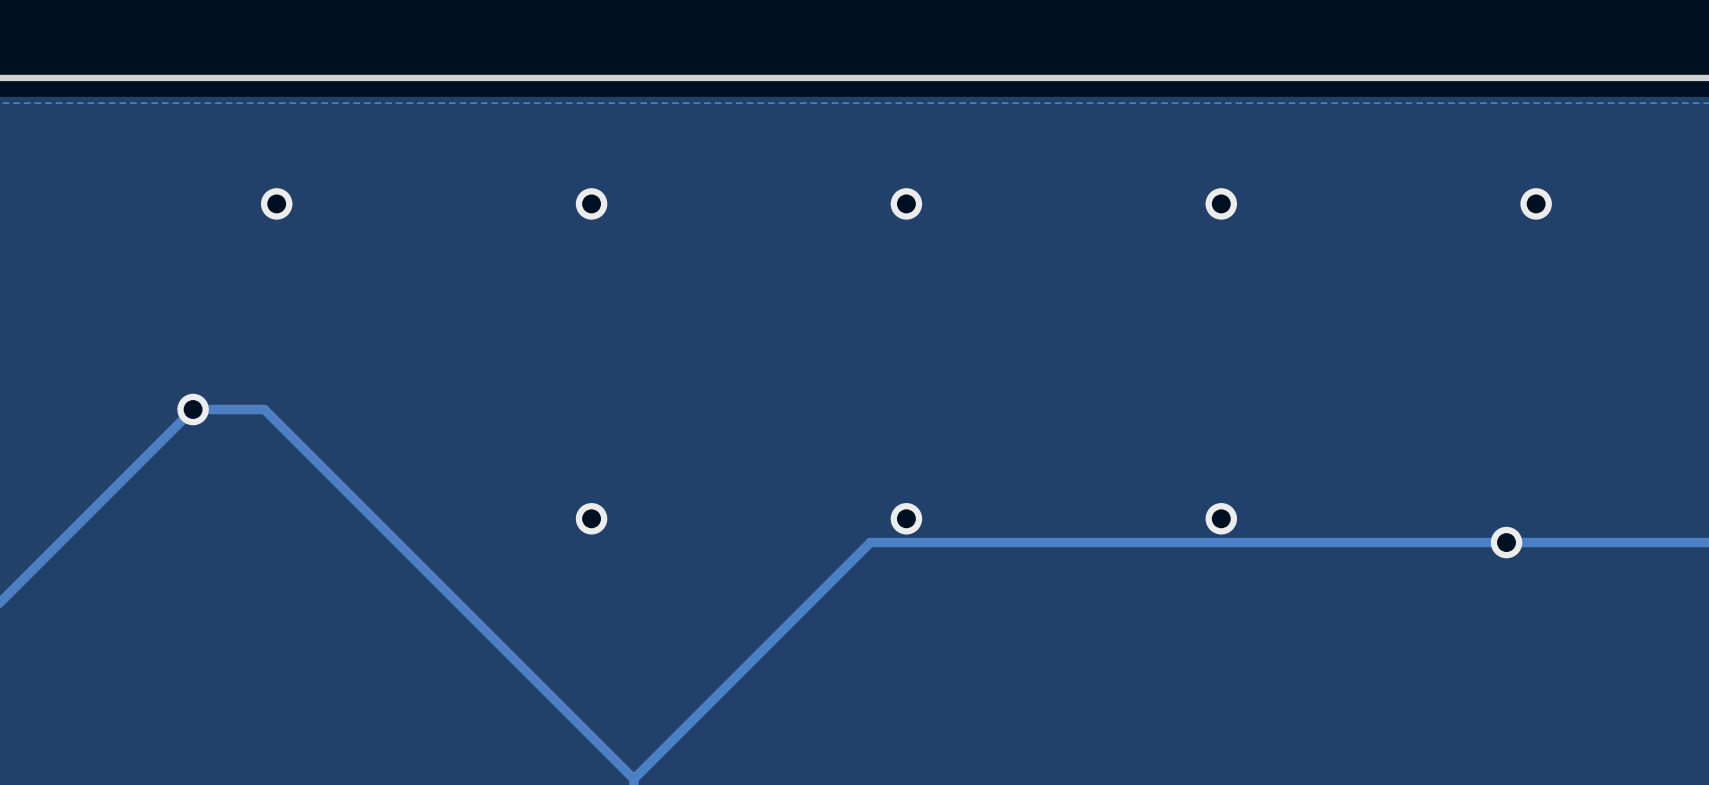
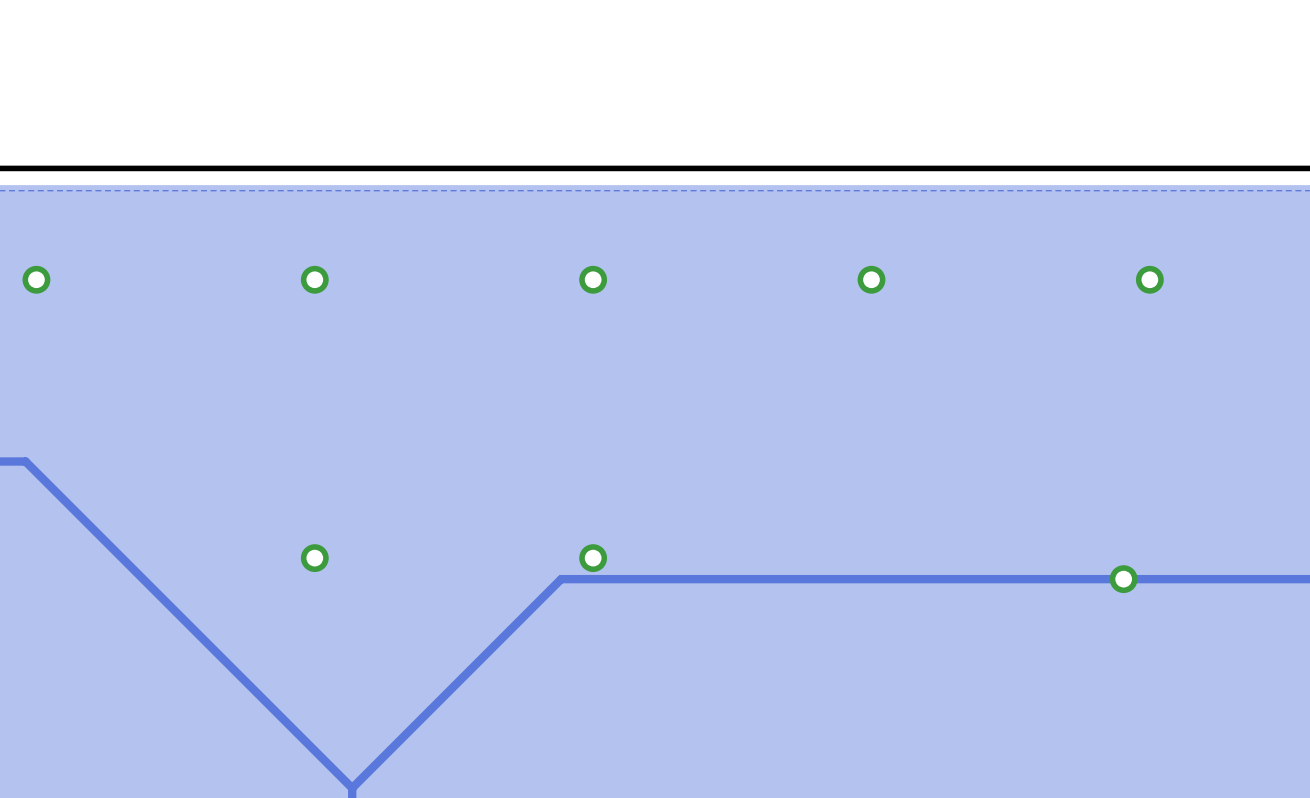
via: (1221, 518) -> none

